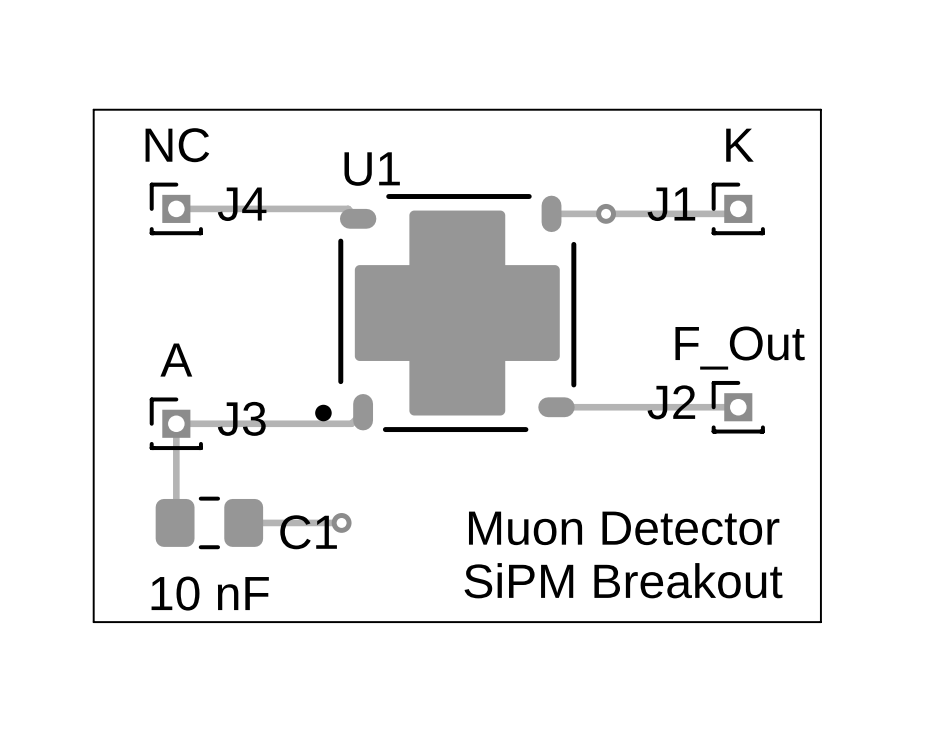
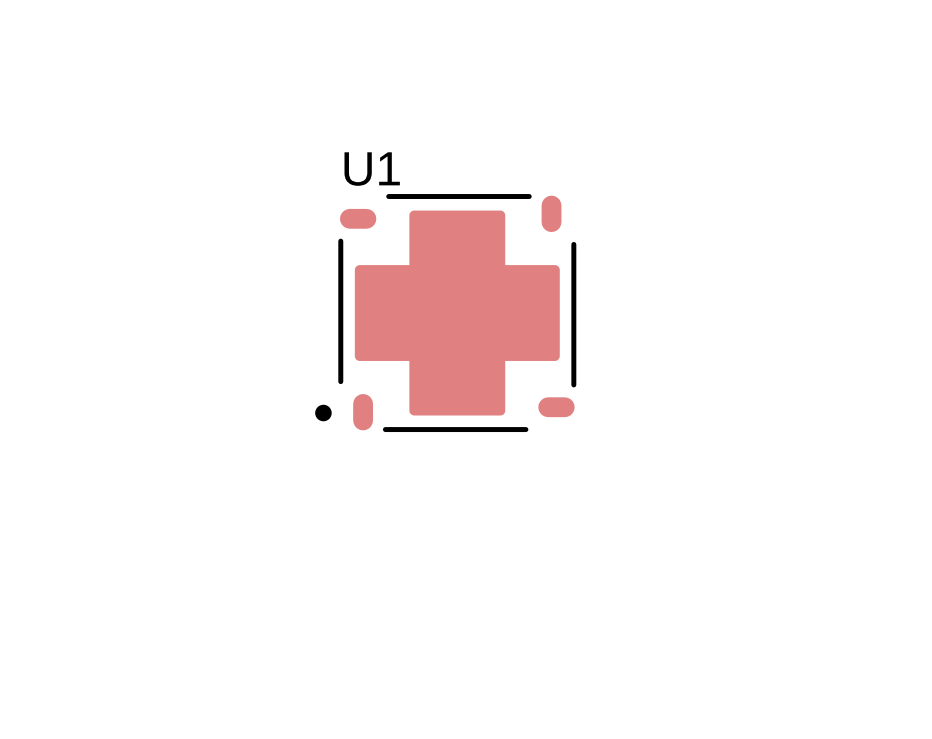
board edge: (93, 109) (820, 109) (820, 622) (93, 622) (93, 109) -> none
J4: NC (176, 208) -> none
track: (738, 208) (733, 213) (551, 213) -> none
J1: K (738, 208) -> none
via: (606, 213) -> none
track: (186, 218) (176, 208) (348, 208) (358, 218) -> none
track: (556, 407) (738, 407) -> none
J2: F_Out (738, 407) -> none
track: (363, 412) (351, 423) (176, 423) (175, 522) -> none
J3: A (176, 423) -> none
C1: 10 nF (209, 522) -> none
track: (243, 522) (341, 522) -> none
via: (341, 522) -> none
text: Muon Detector (624, 528) -> none
text: SiPM Breakout (623, 580) -> none

